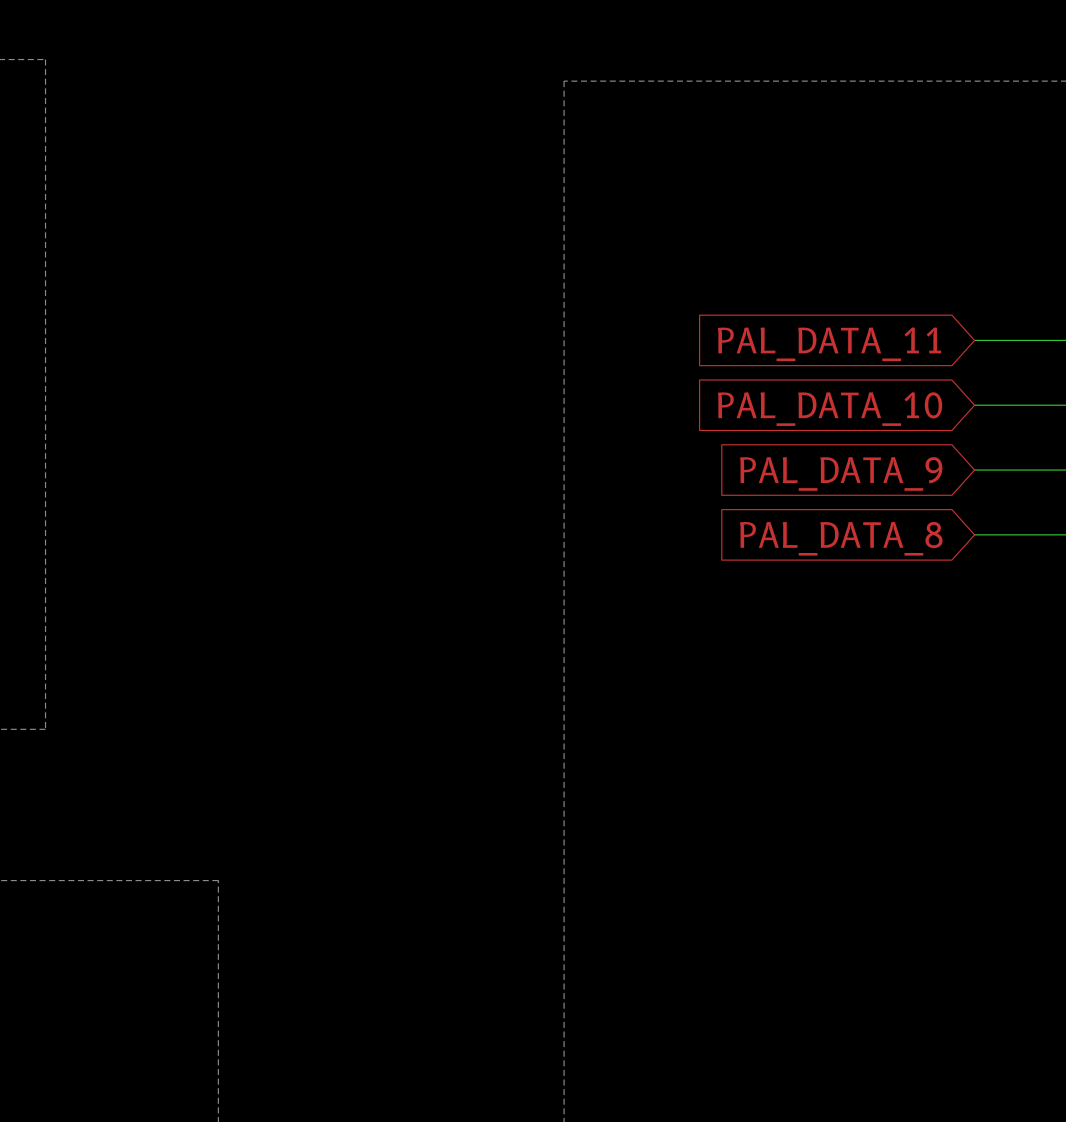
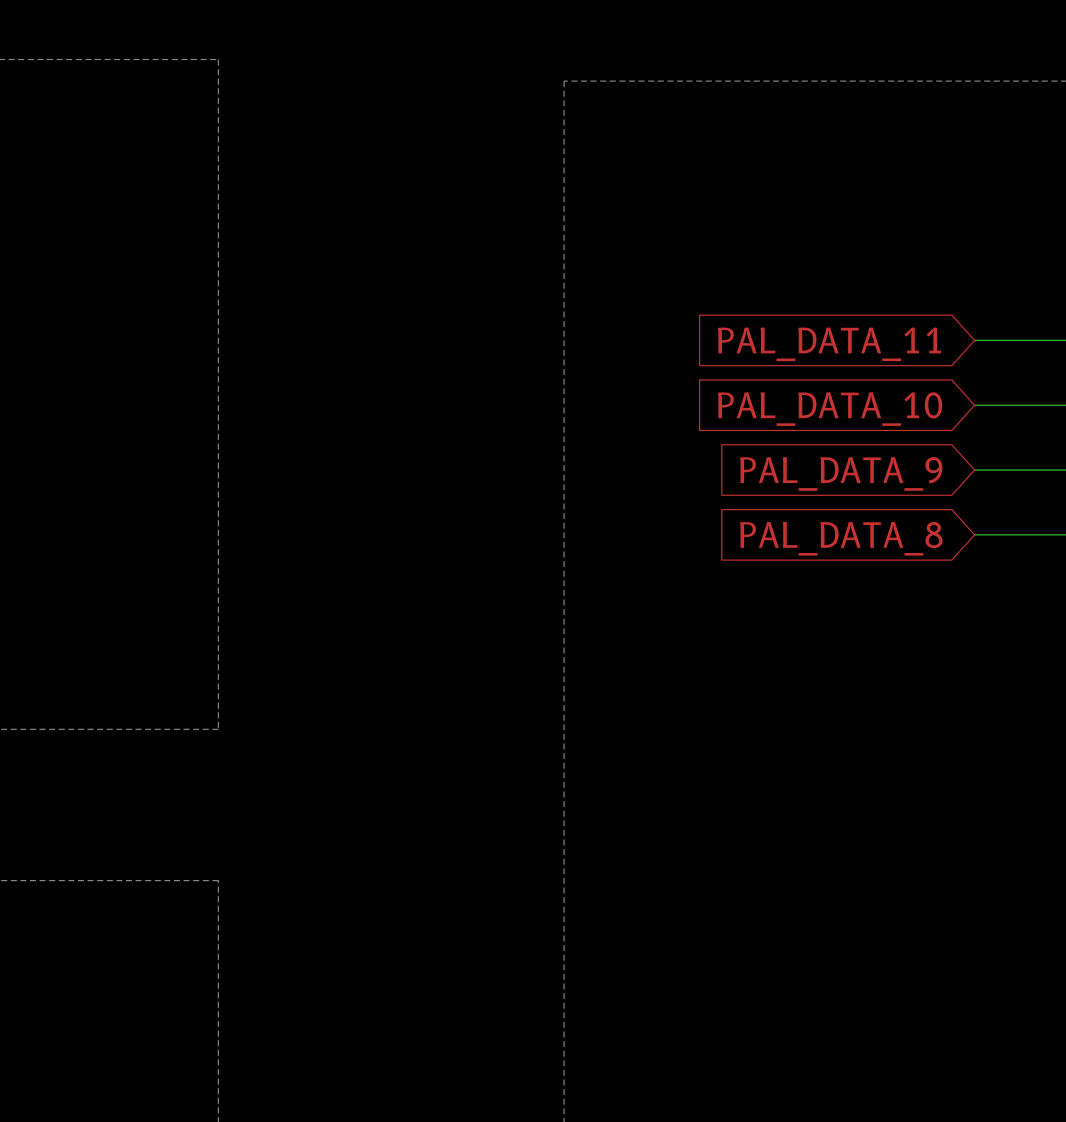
line: (45, 59) (45, 729) -> (45, 59) (218, 59) (218, 729) (45, 729)

